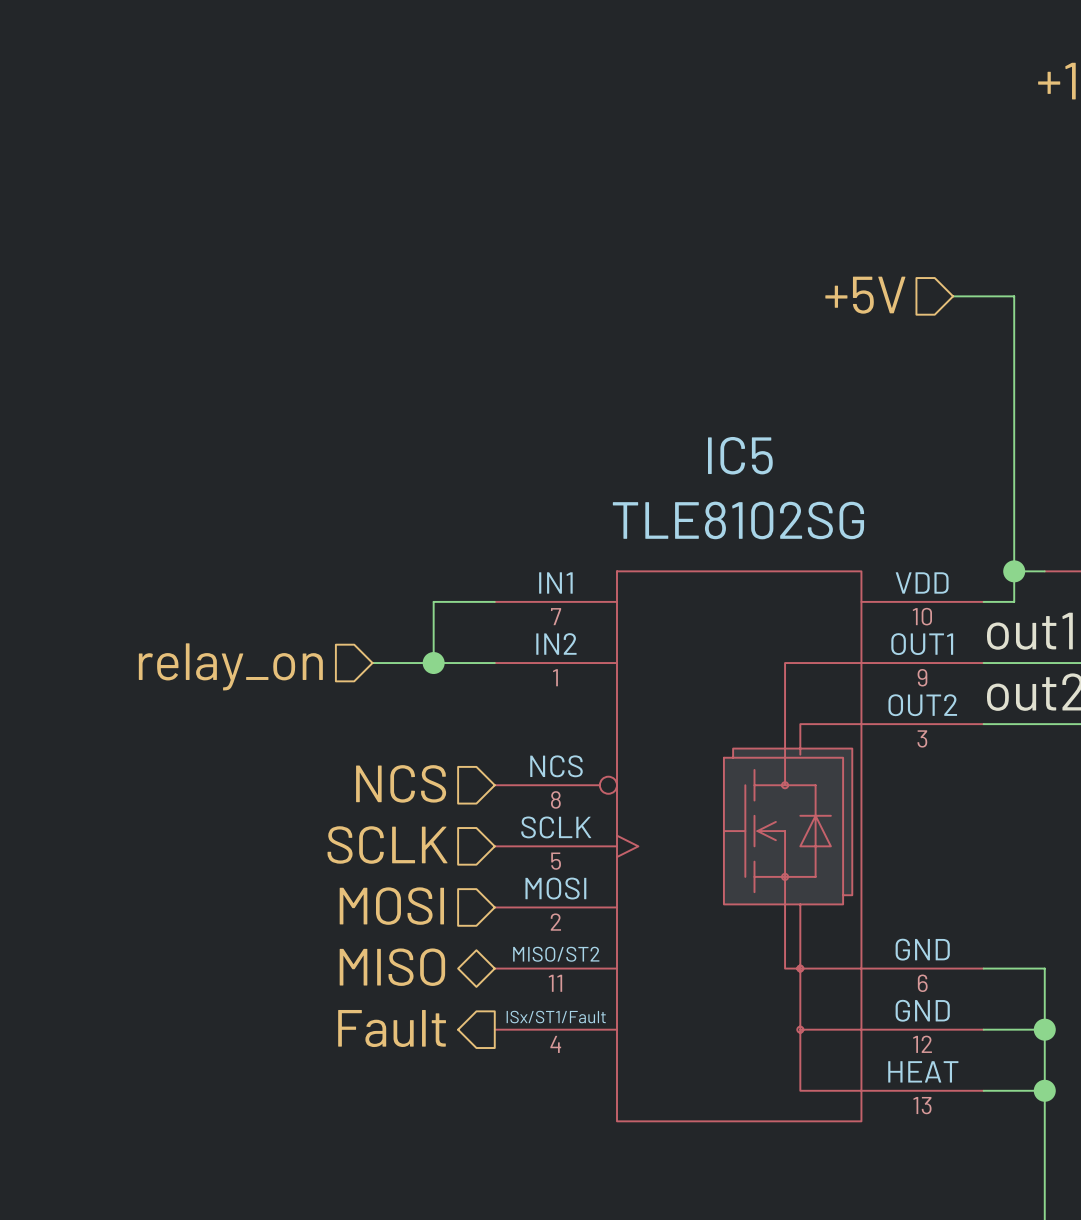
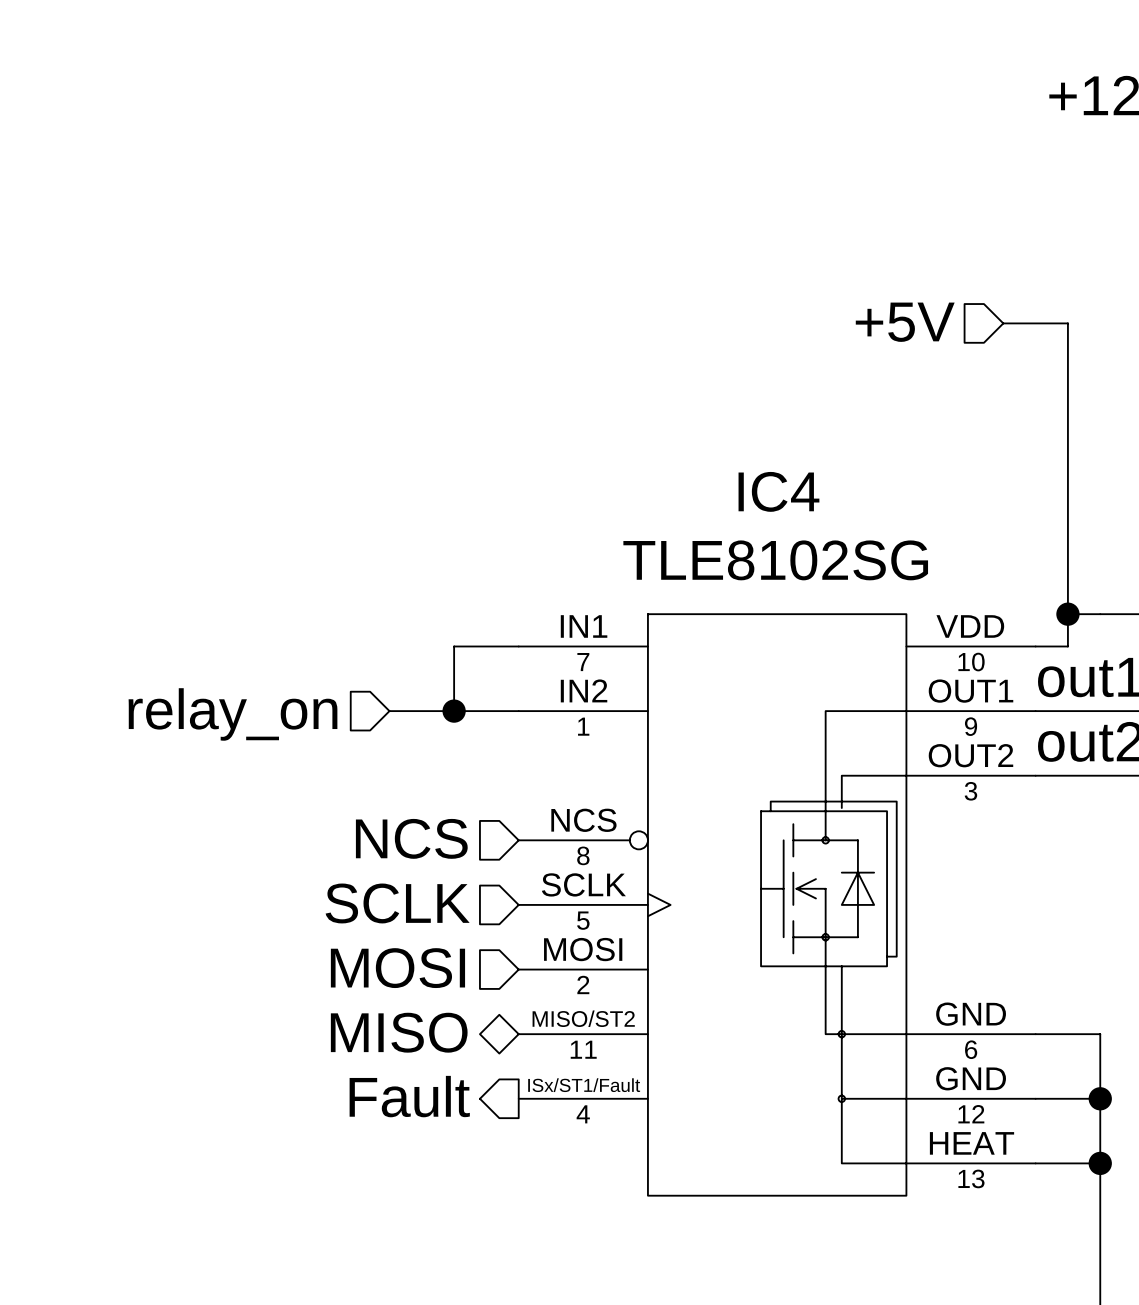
IC5 name: IC5 (740, 455) -> IC4 (778, 491)

